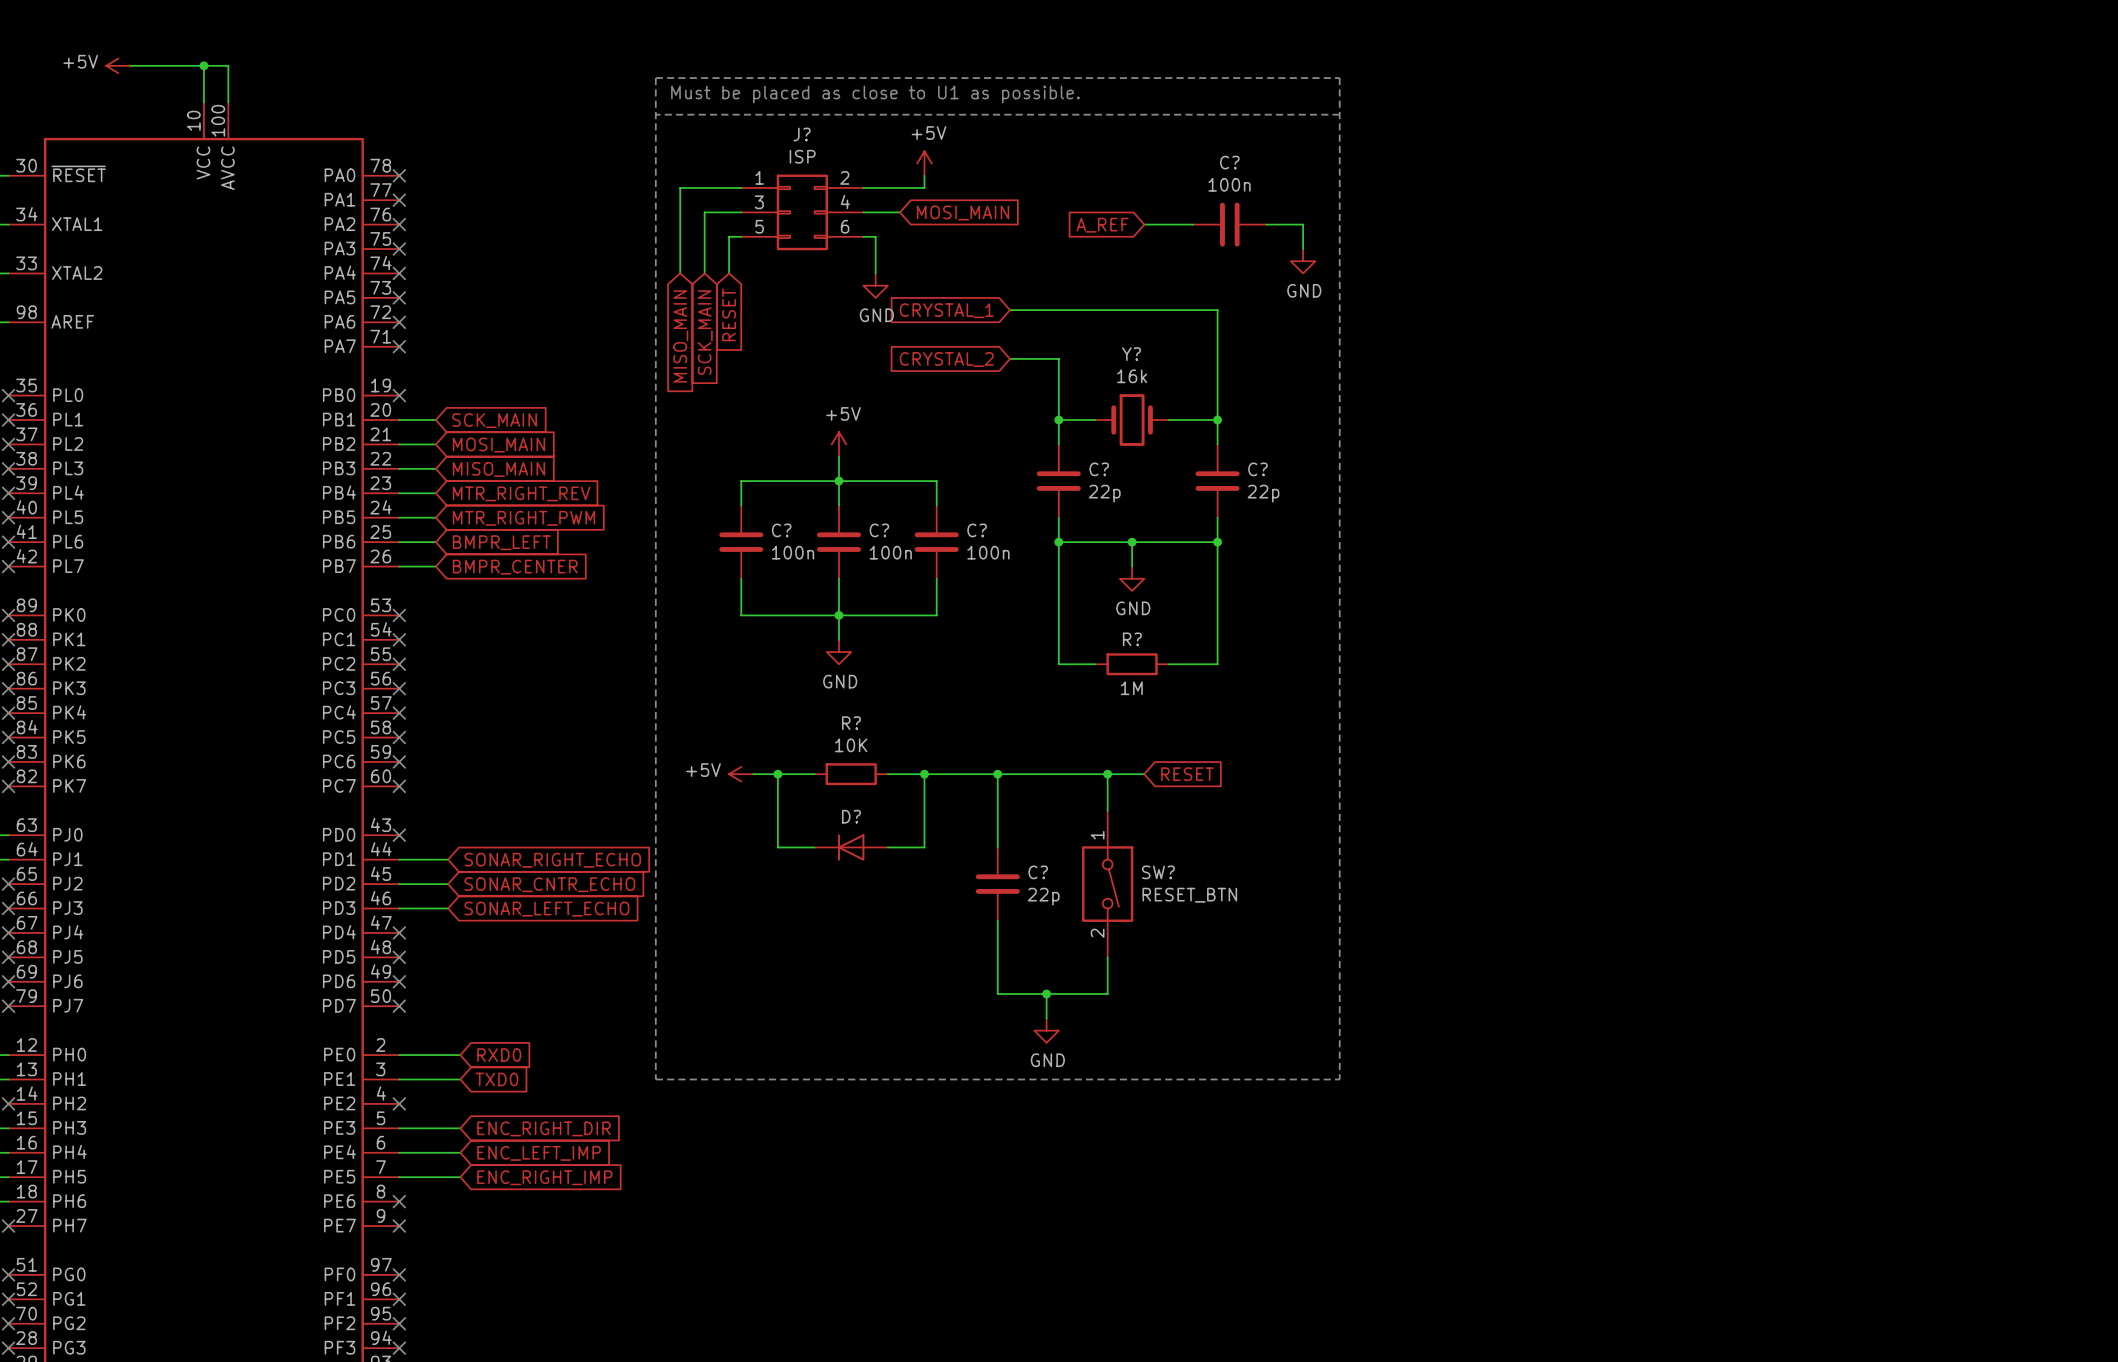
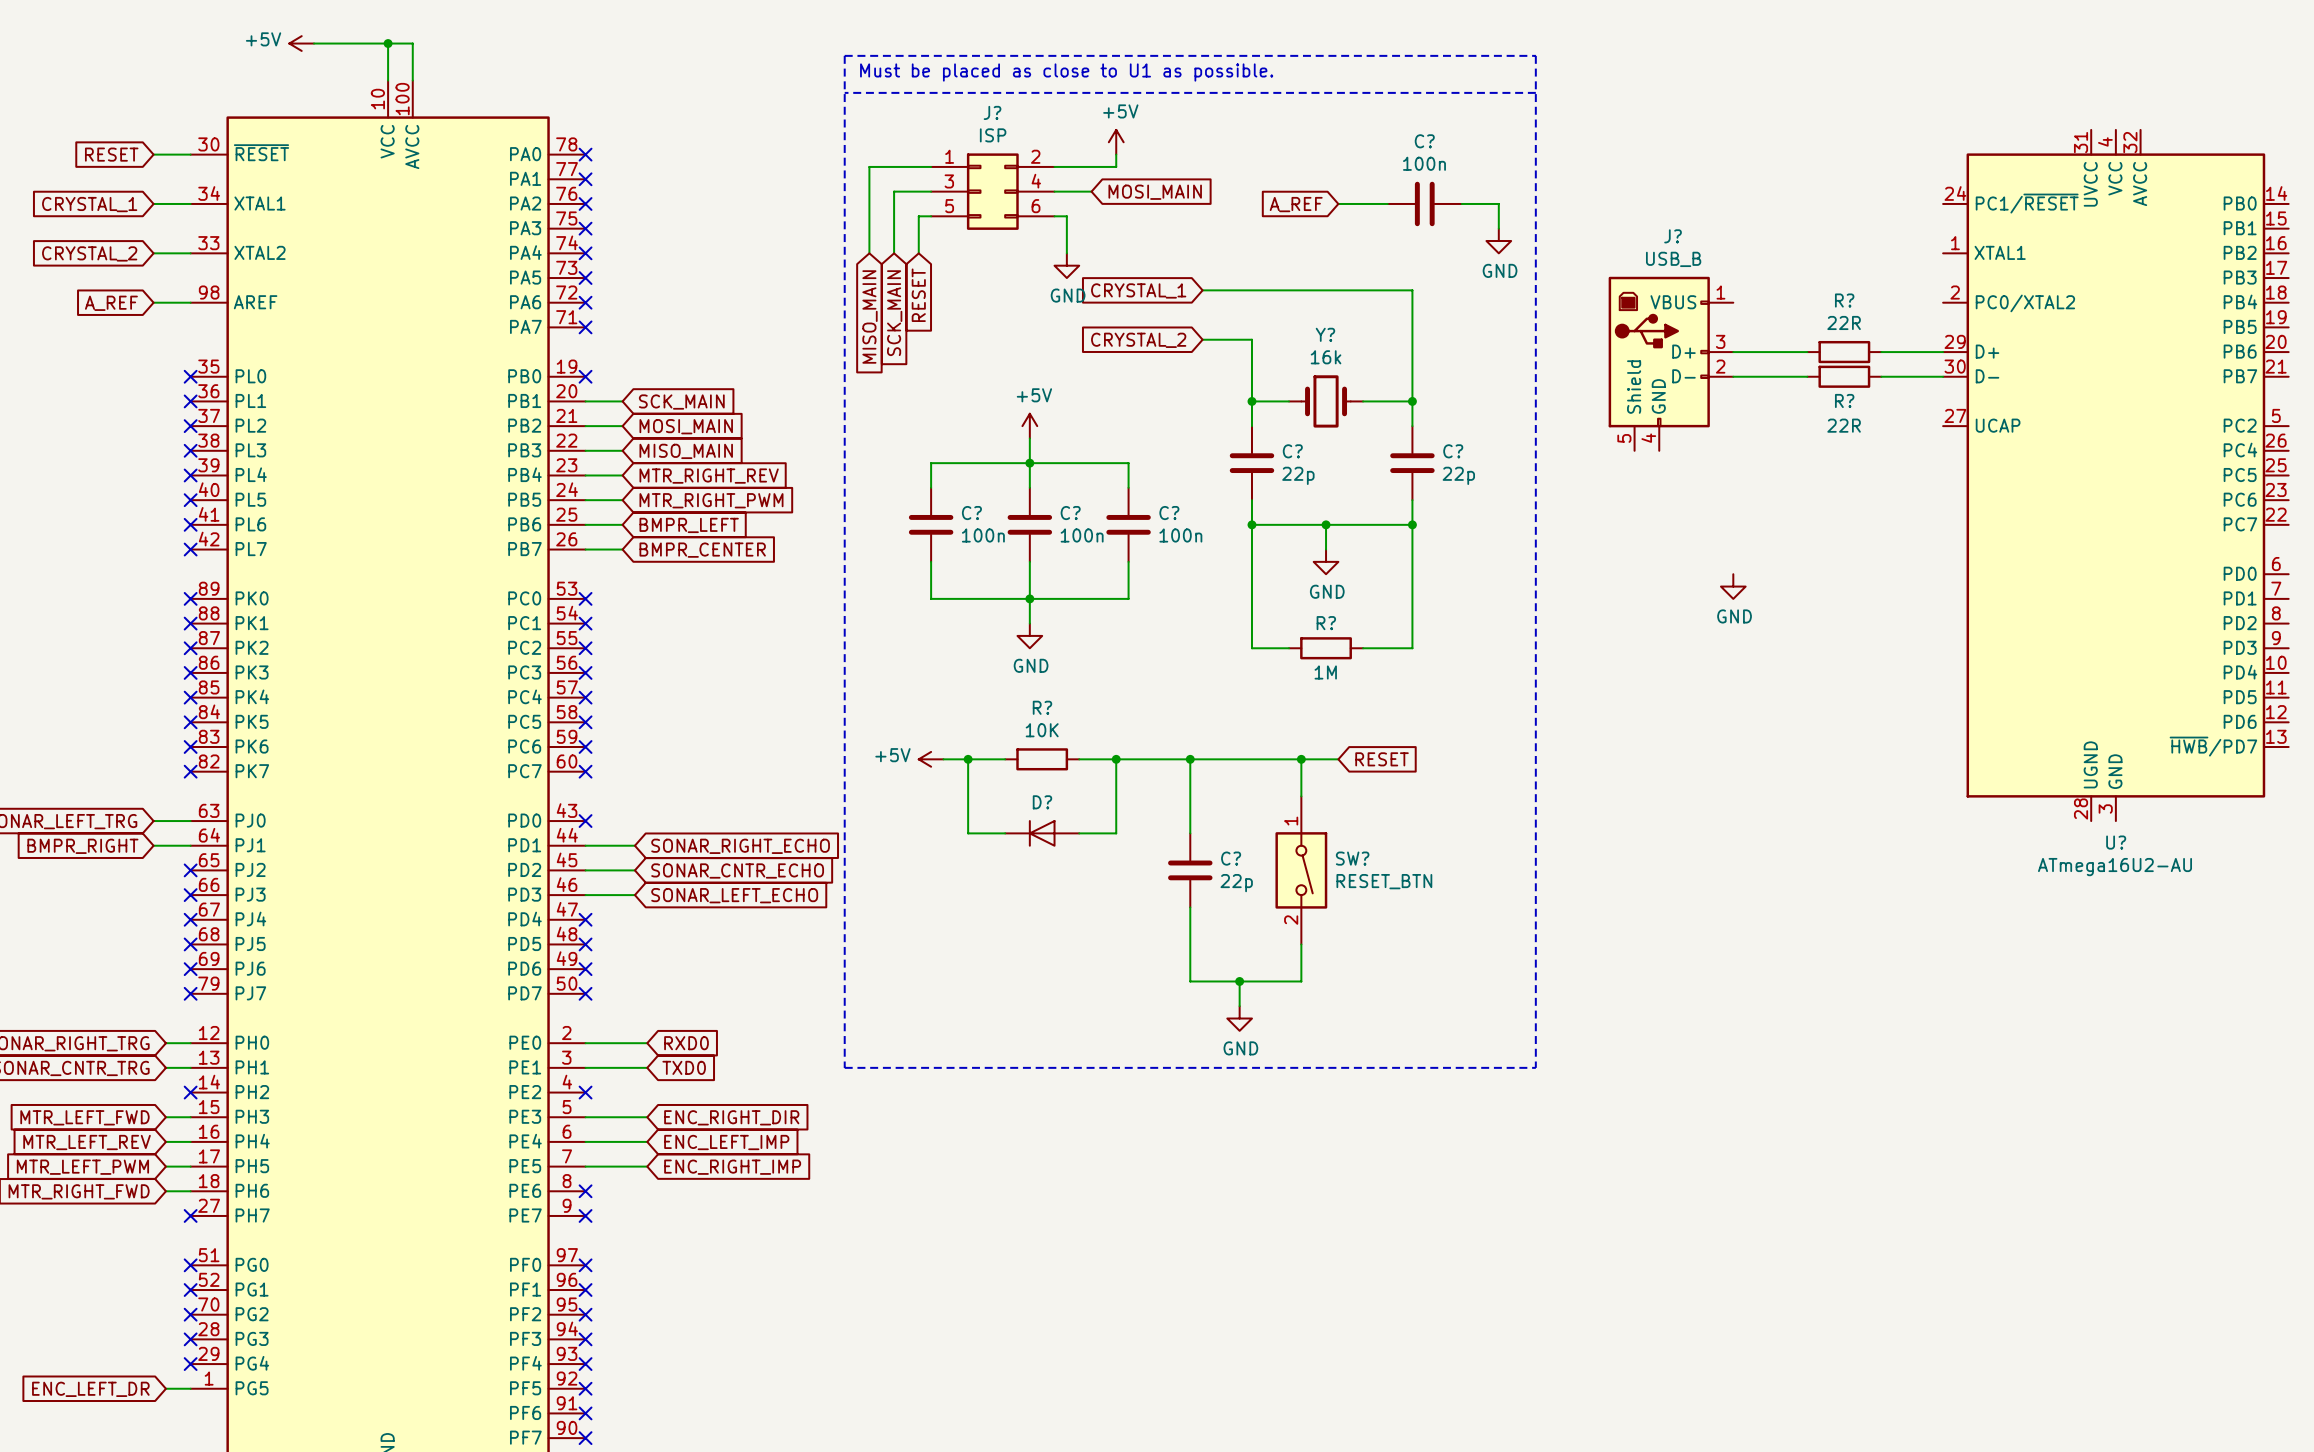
wire: none -> (1733, 352) (1807, 352)
R?: none -> 22R (1844, 352)
wire: none -> (1881, 352) (1943, 352)
J?: none -> USB_B (1670, 363)
wire: none -> (1733, 376) (1807, 376)
R?: none -> 22R (1844, 376)
wire: none -> (1881, 376) (1943, 376)
U?: none -> ATmega16U2-AU (2115, 475)
power symbol: none -> GND (1733, 586)

